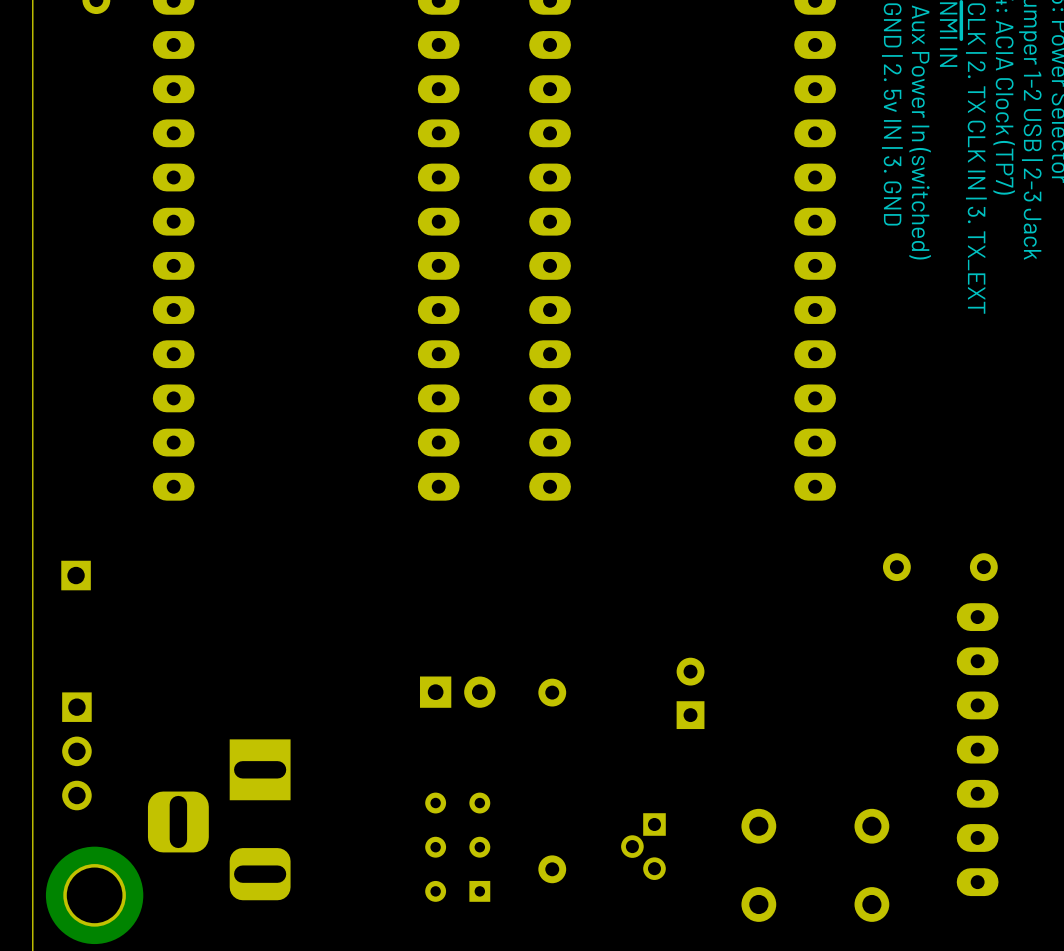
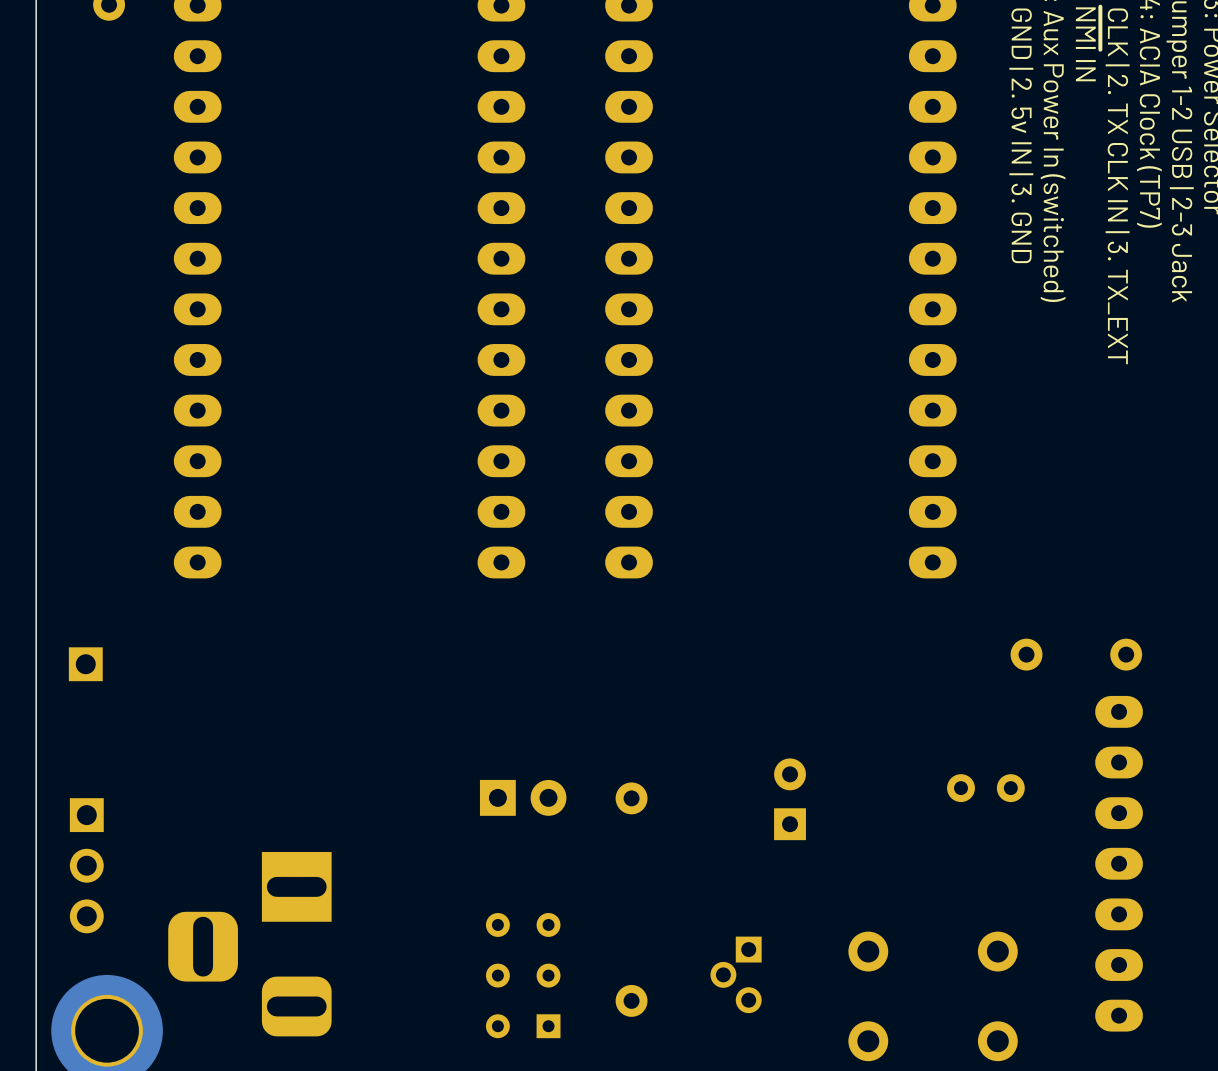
part: none -> (985, 788)

